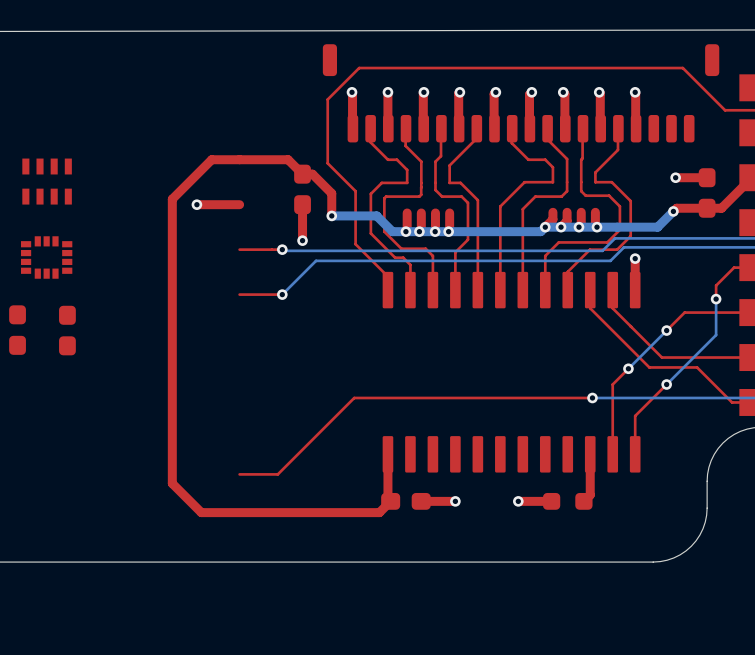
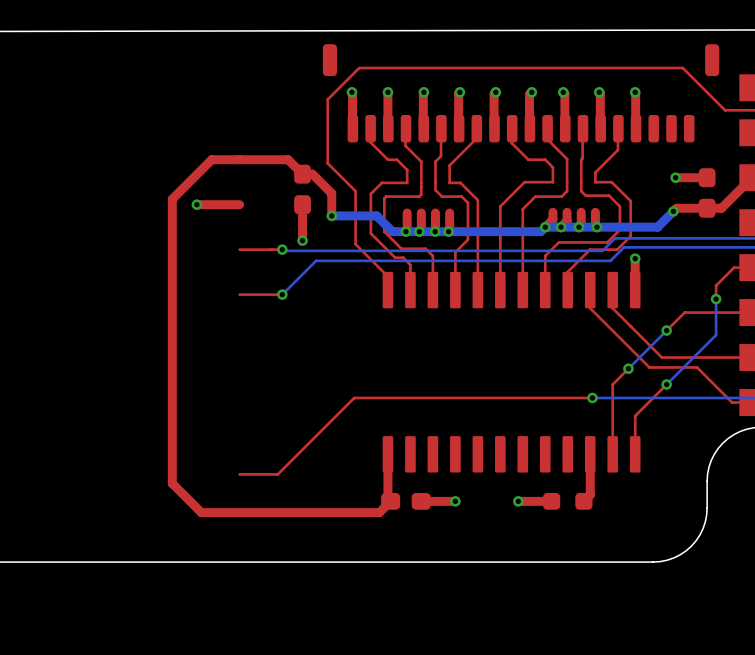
part: (47, 181) -> none
part: (46, 257) -> none
part: (17, 330) -> none
part: (67, 330) -> none

